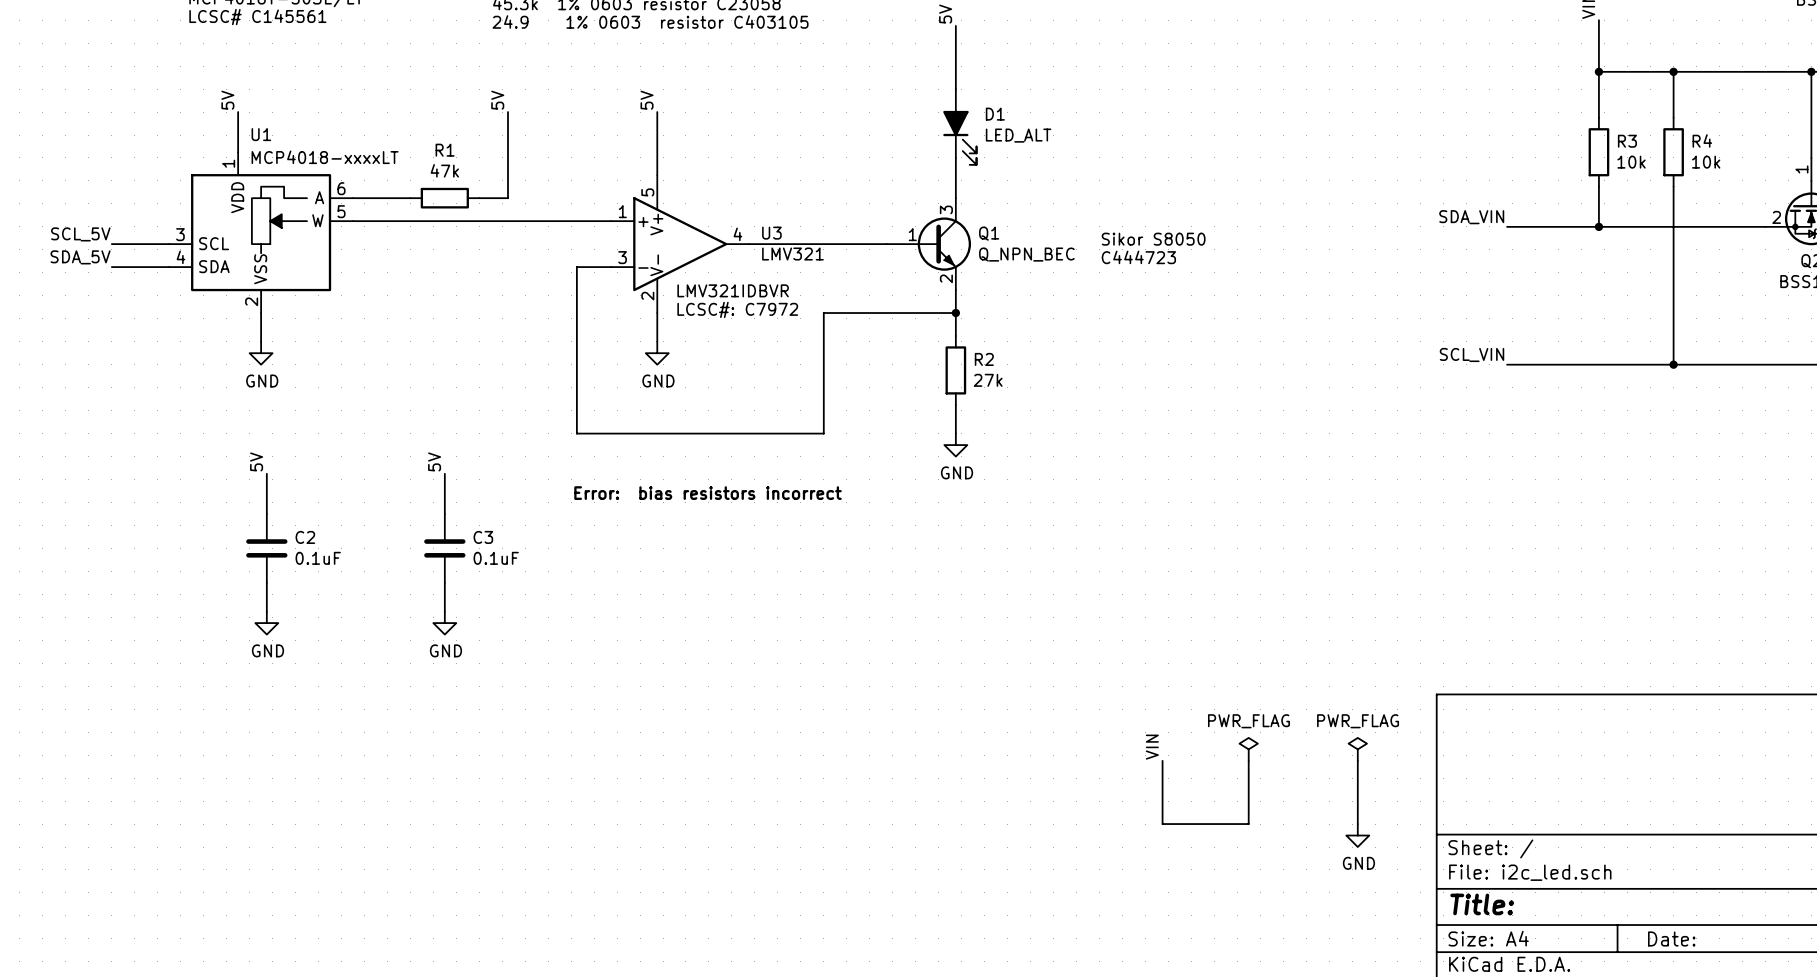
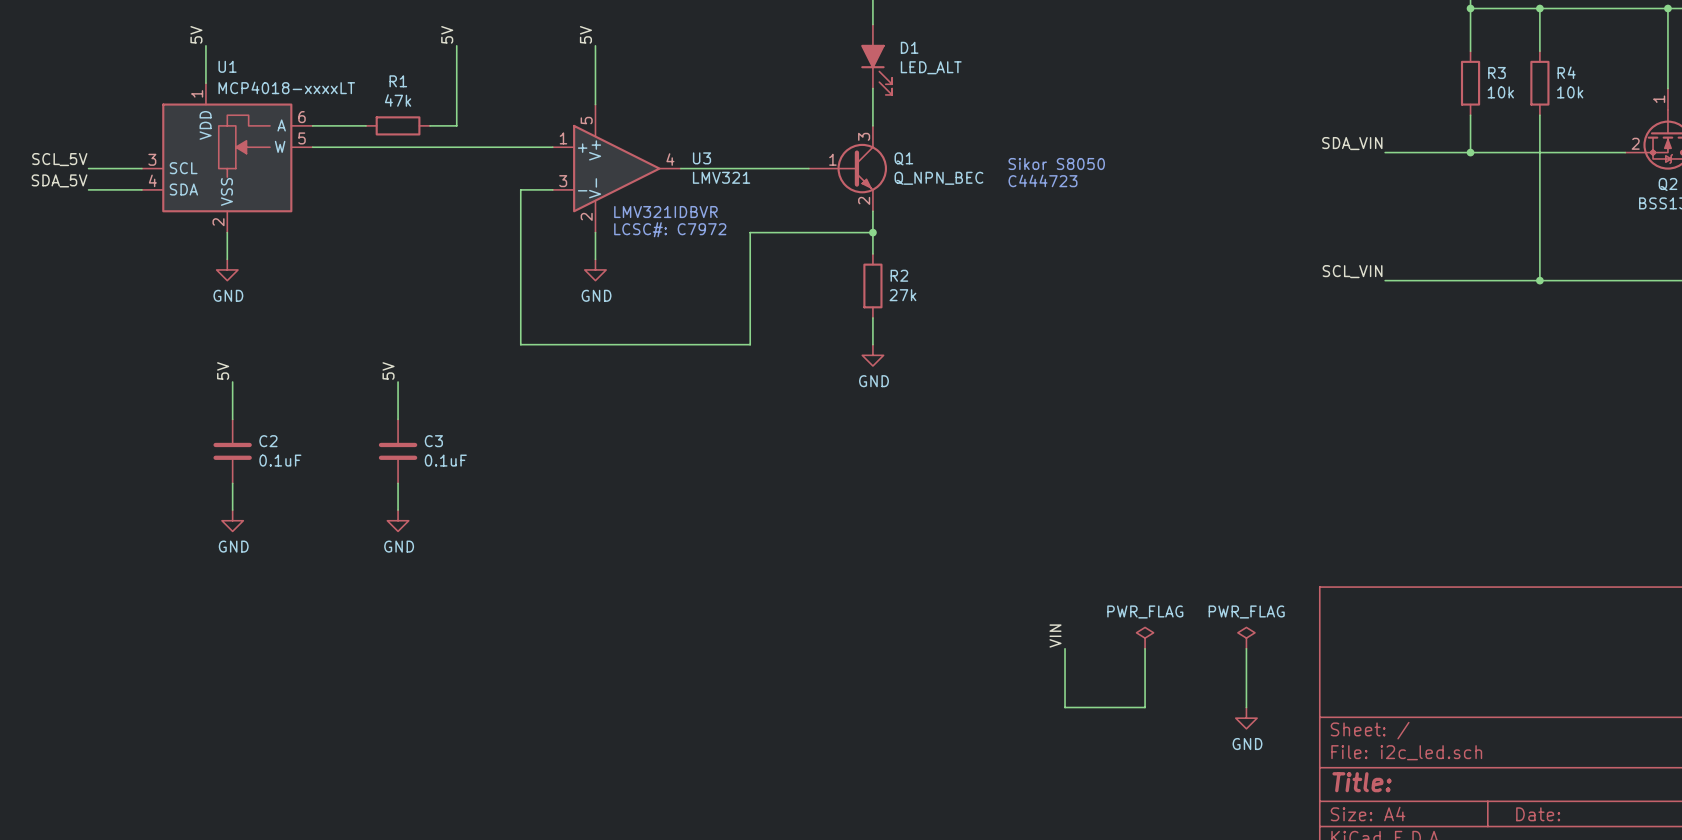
text: Error: bias resistors incorrect (708, 493) -> none

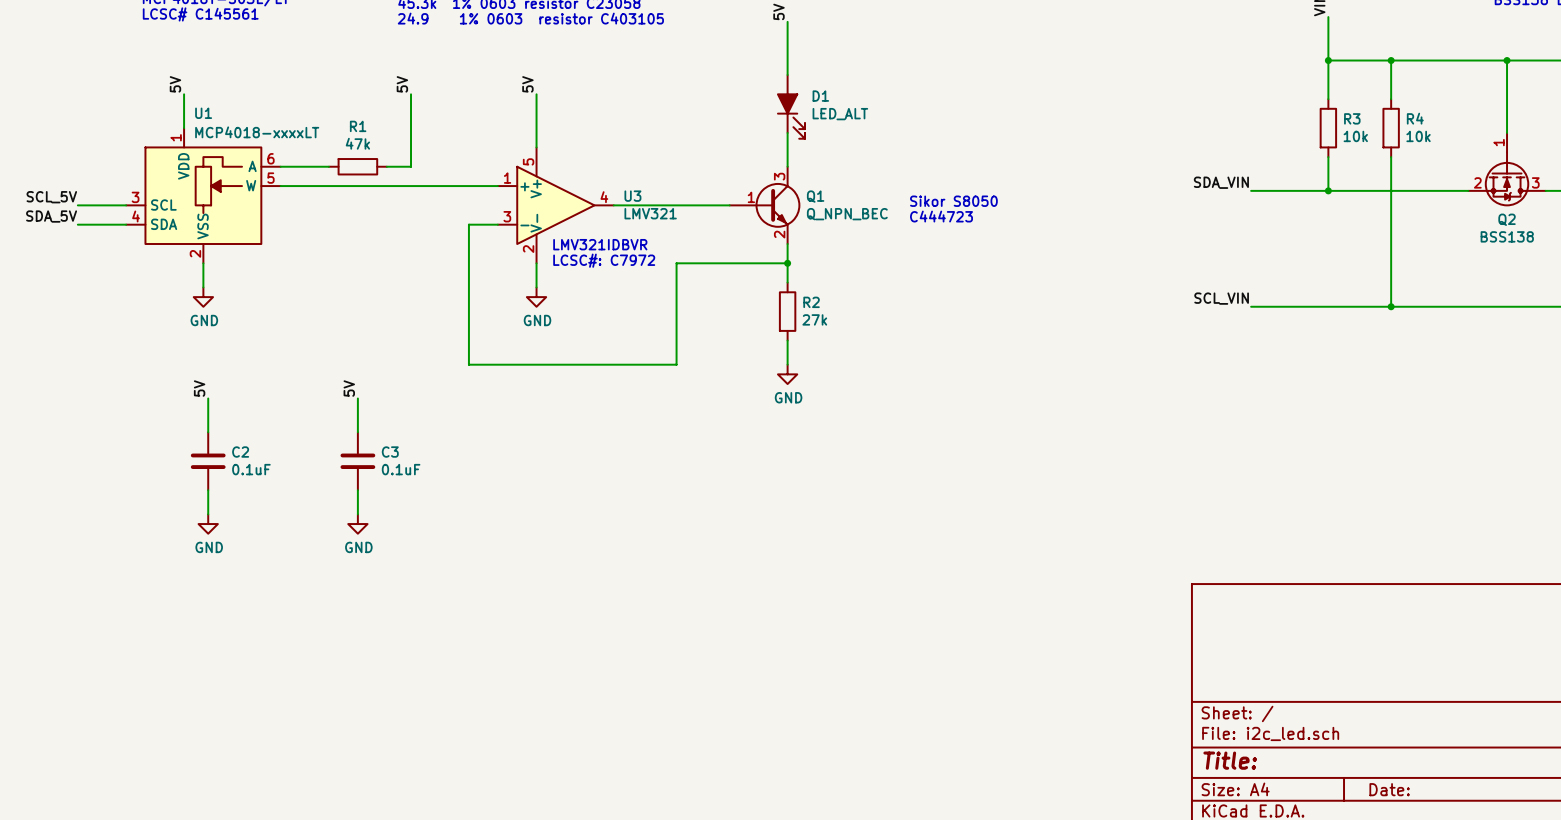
label: VIN (1055, 636) -> none
power symbol: PWR_FLAG (1145, 638) -> none
power symbol: PWR_FLAG (1246, 638) -> none
wire: (1065, 648) (1065, 707) (1145, 707) (1145, 648) -> none
wire: (1246, 648) (1246, 707) -> none
power symbol: GND (1246, 718) -> none

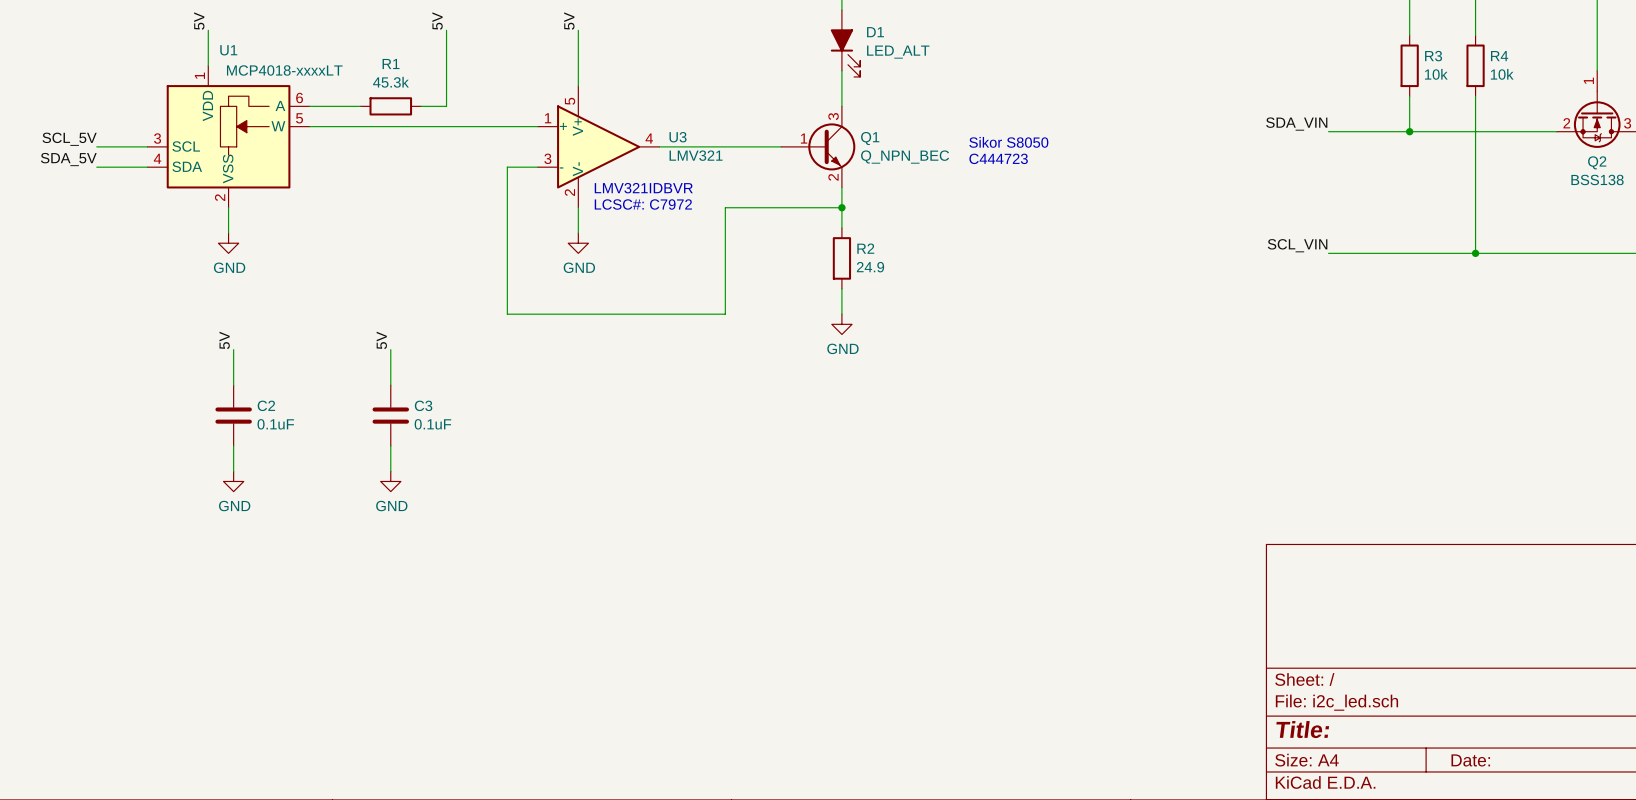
R1 value: 47k (357, 143) -> 45.3k (390, 82)
R2 value: 27k (814, 319) -> 24.9 (870, 267)

